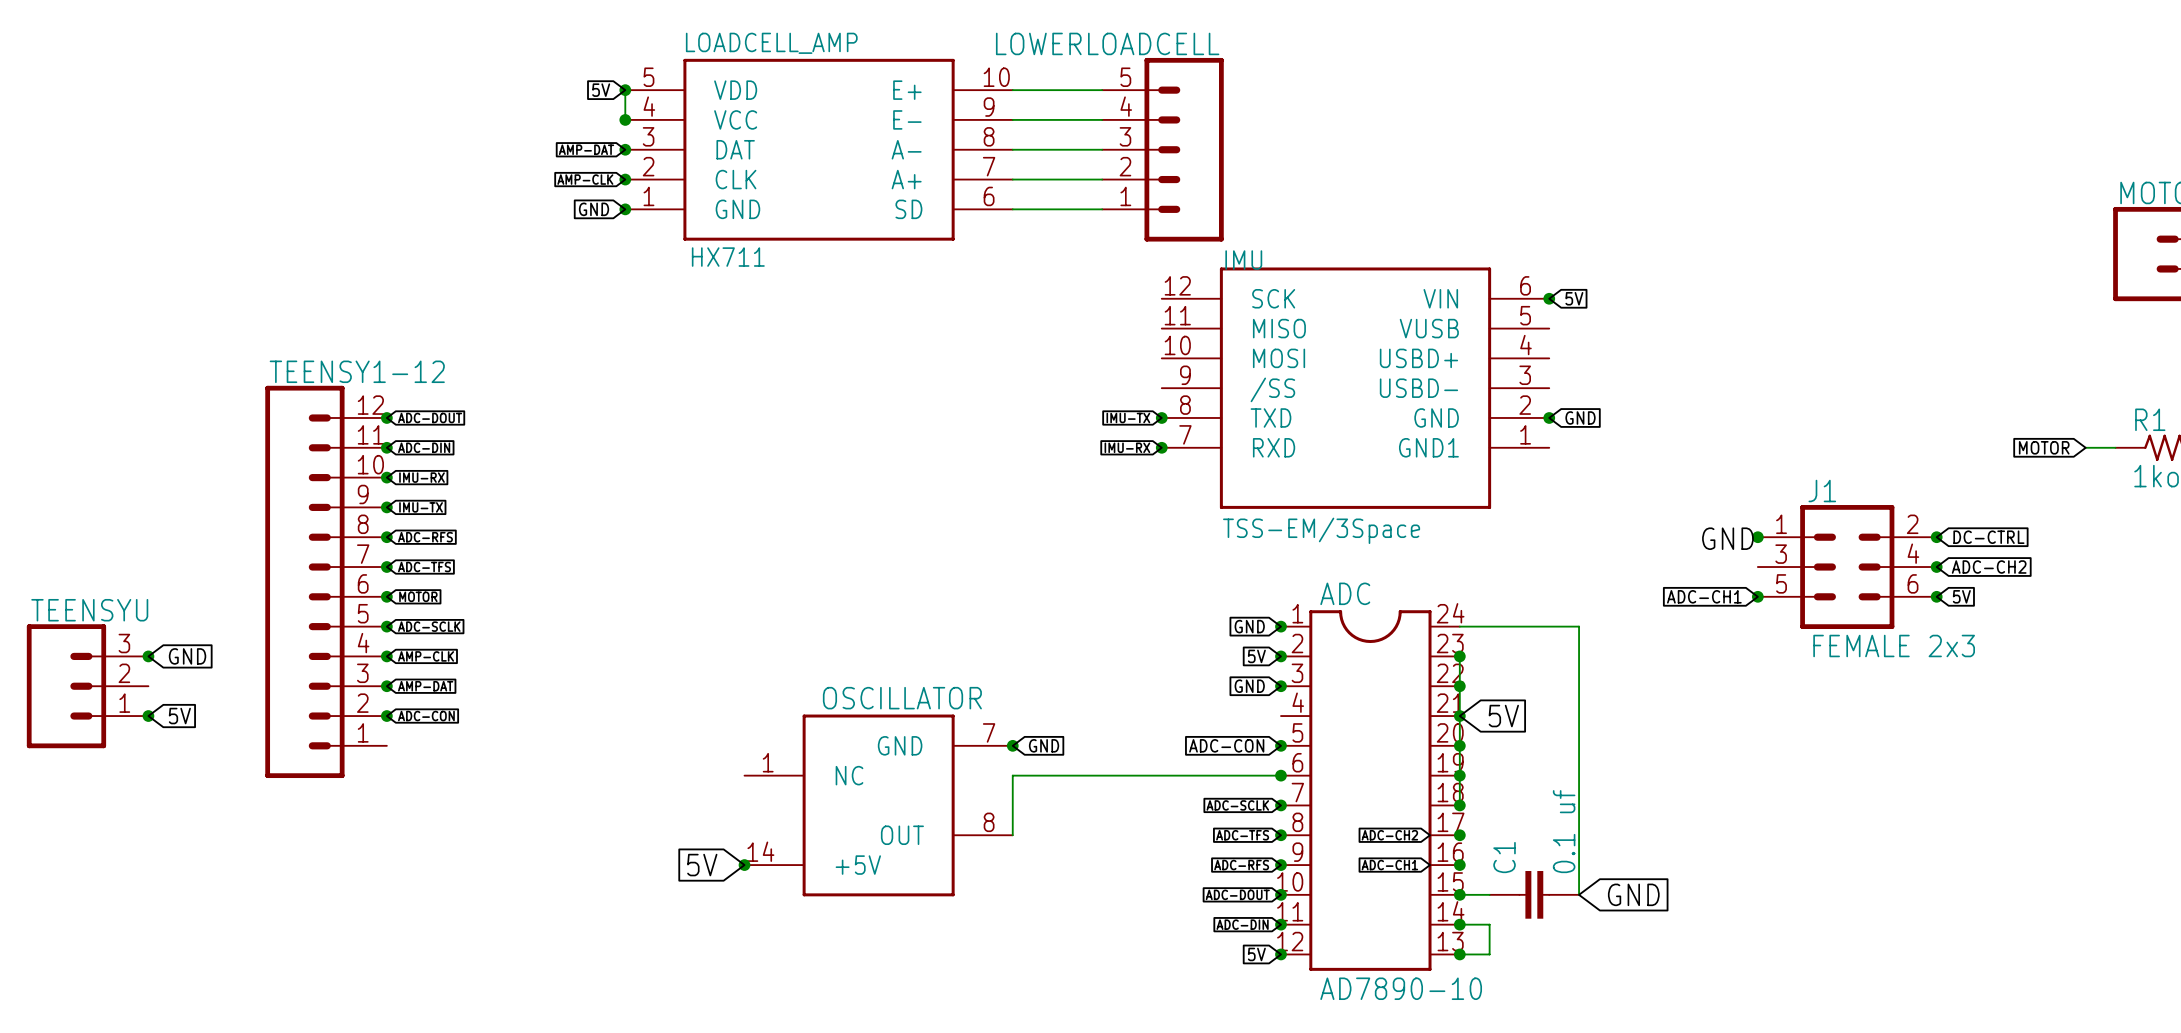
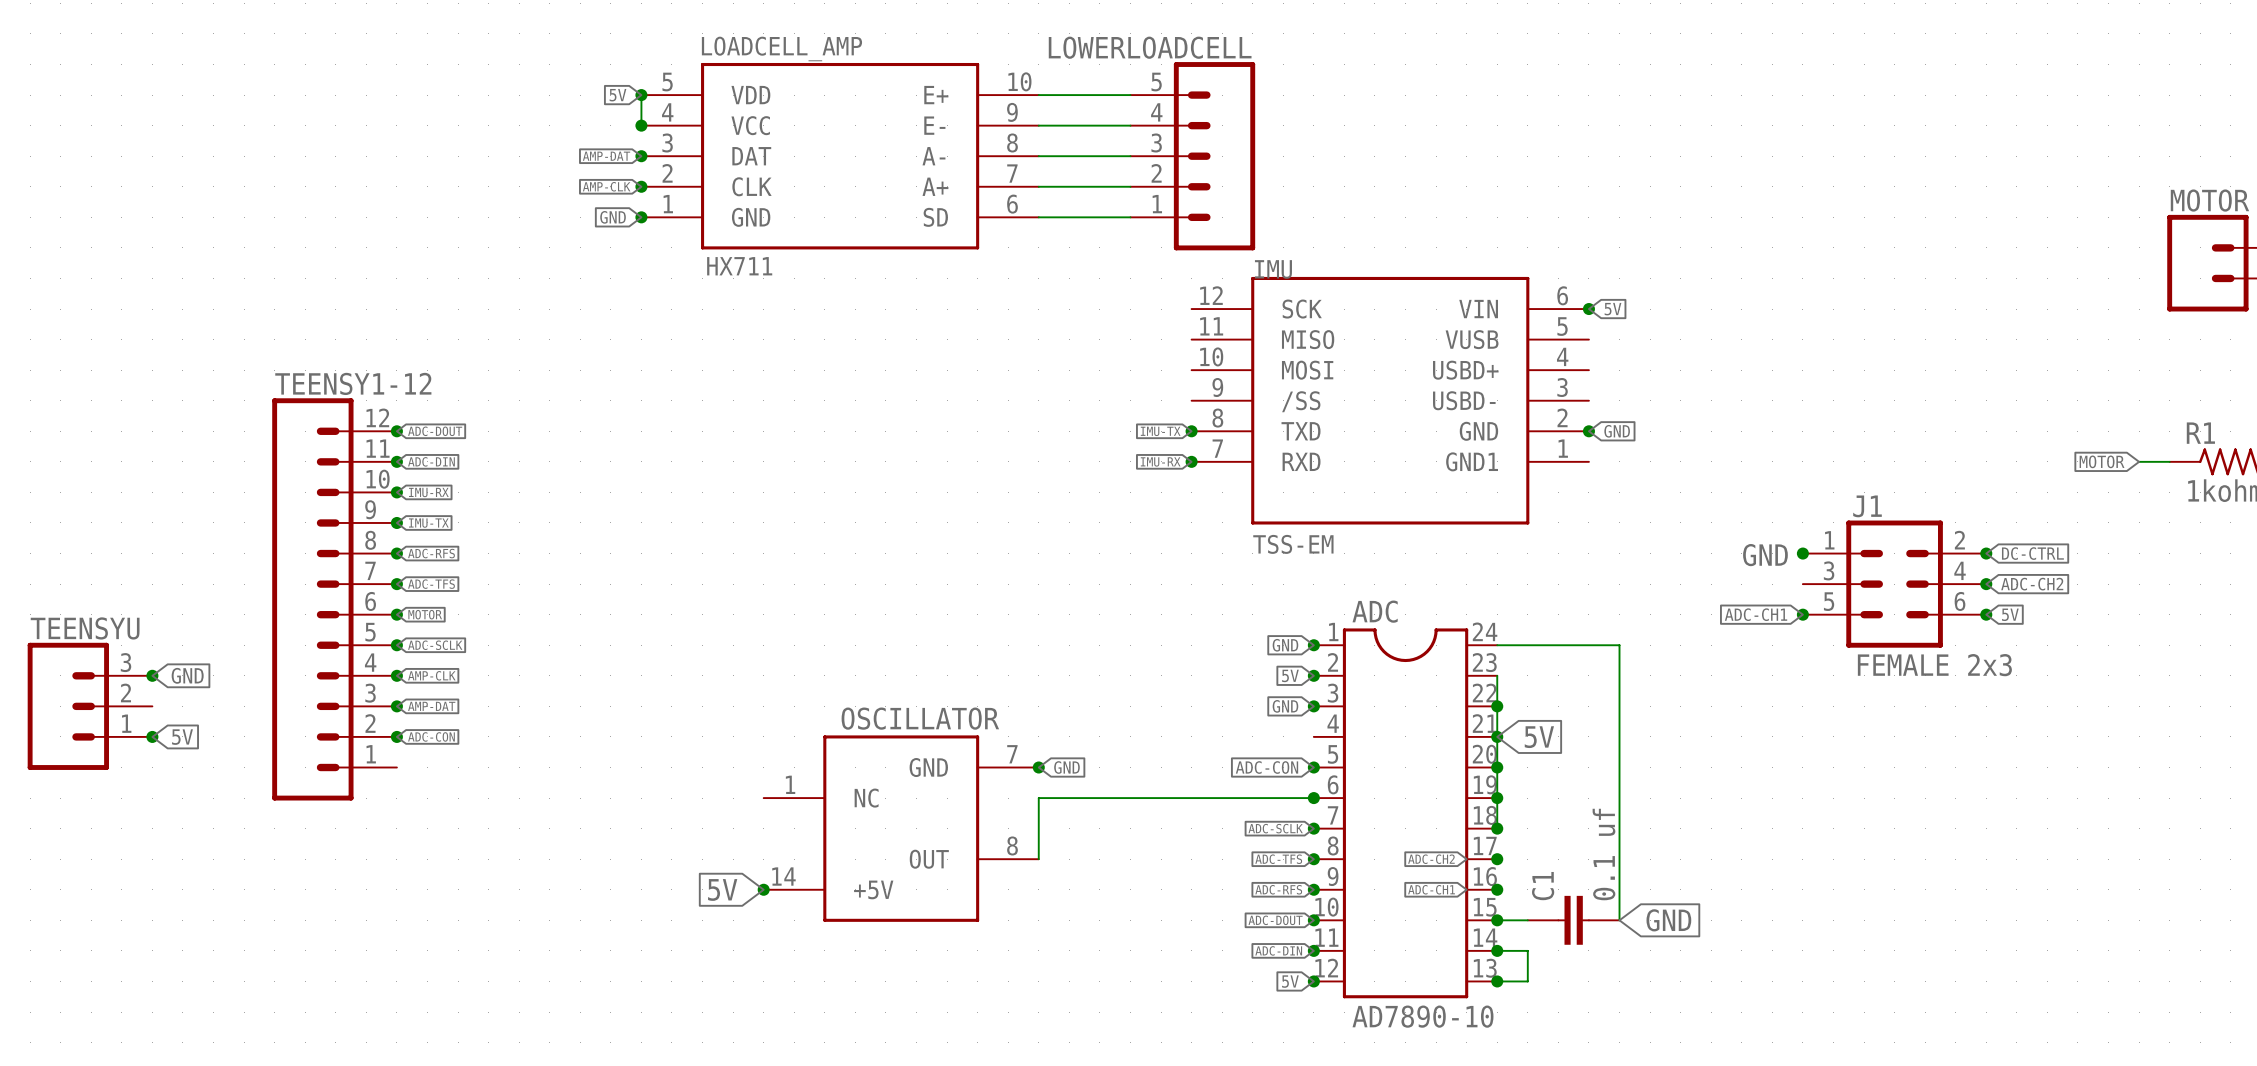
IMU value: TSS-EM/3Space (1321, 530) -> TSS-EM (1293, 544)
junction: (1459, 656) -> none

